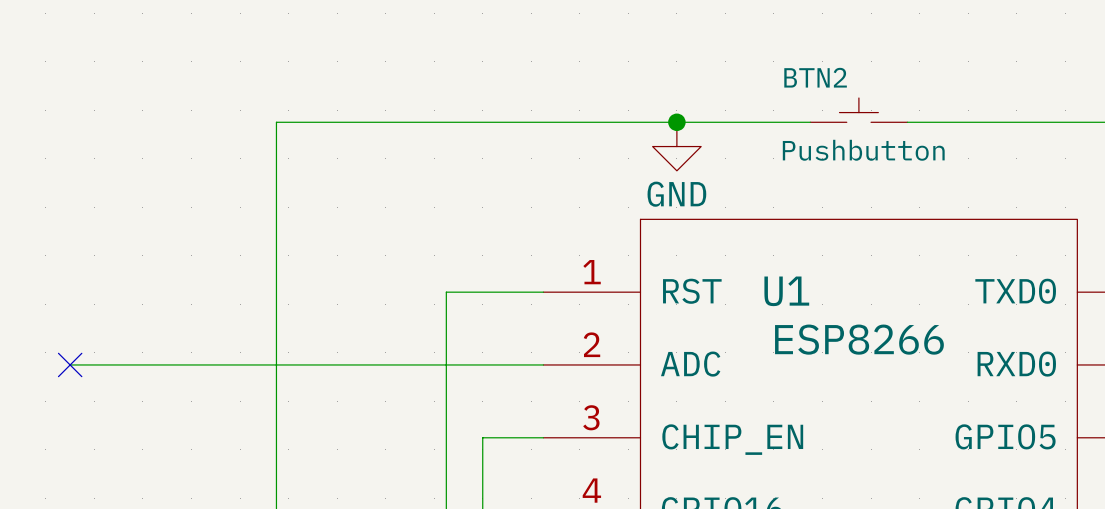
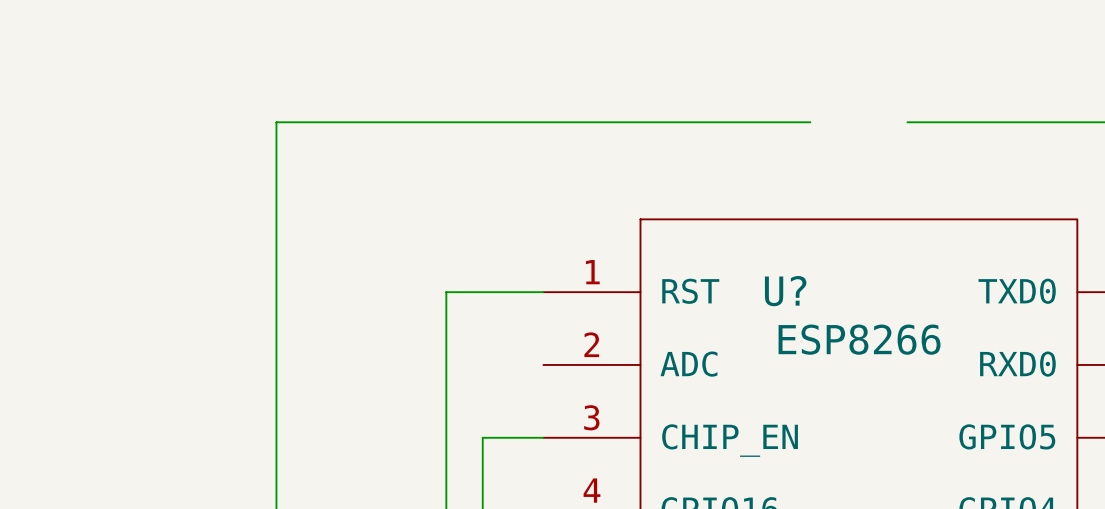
BTN2: Pushbutton (858, 110) -> none
junction: (676, 122) -> none
power symbol: GND (676, 146) -> none
U1 name: U1 (786, 291) -> U? (785, 291)
wire: (70, 364) (543, 364) -> none
no-connect mark: (70, 364) -> none

